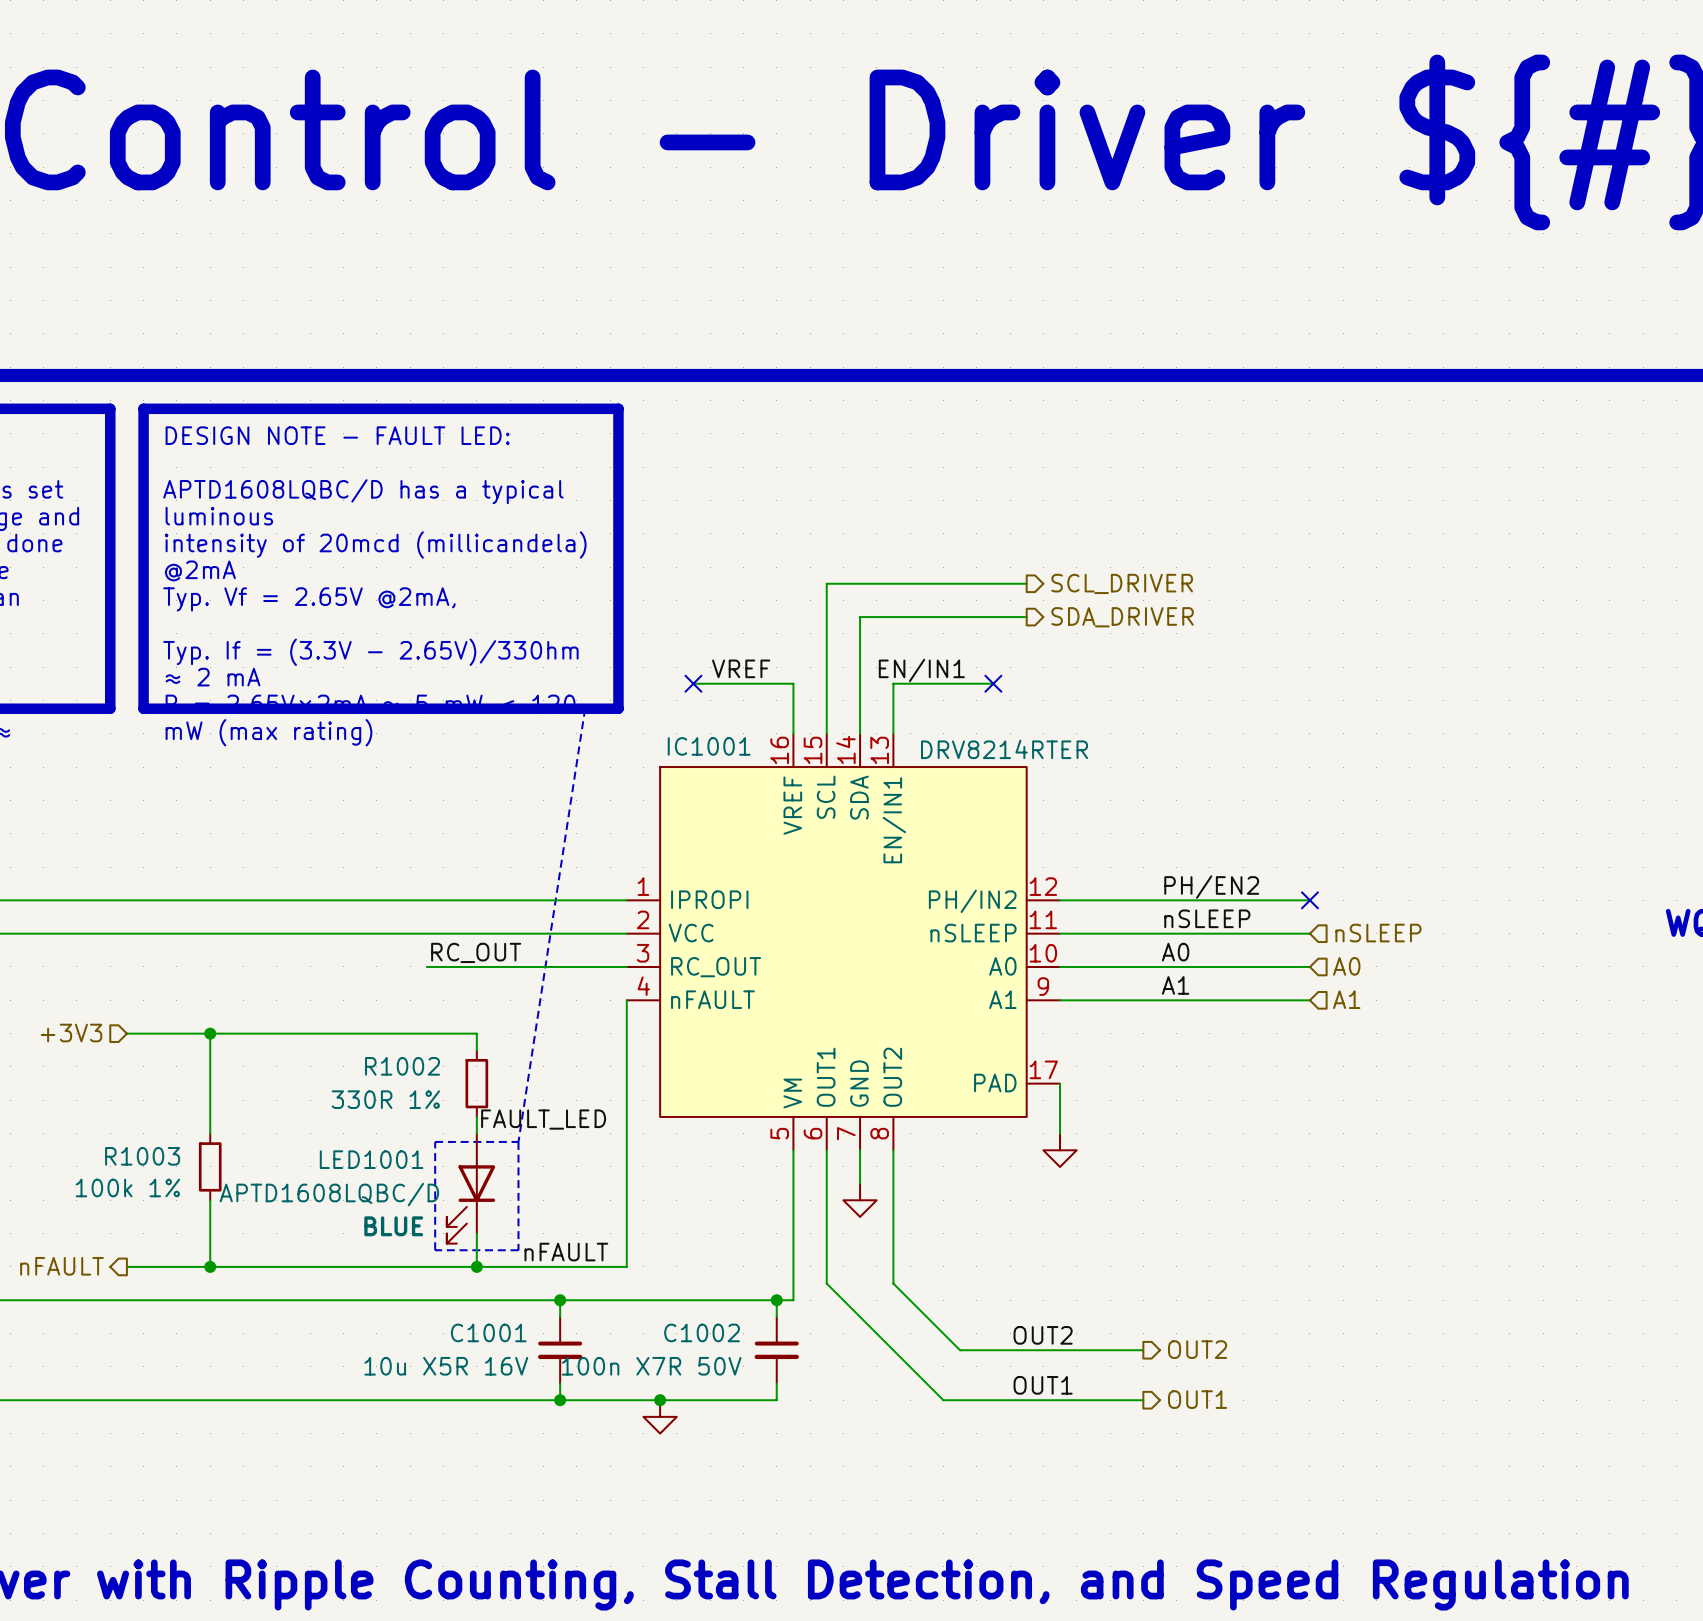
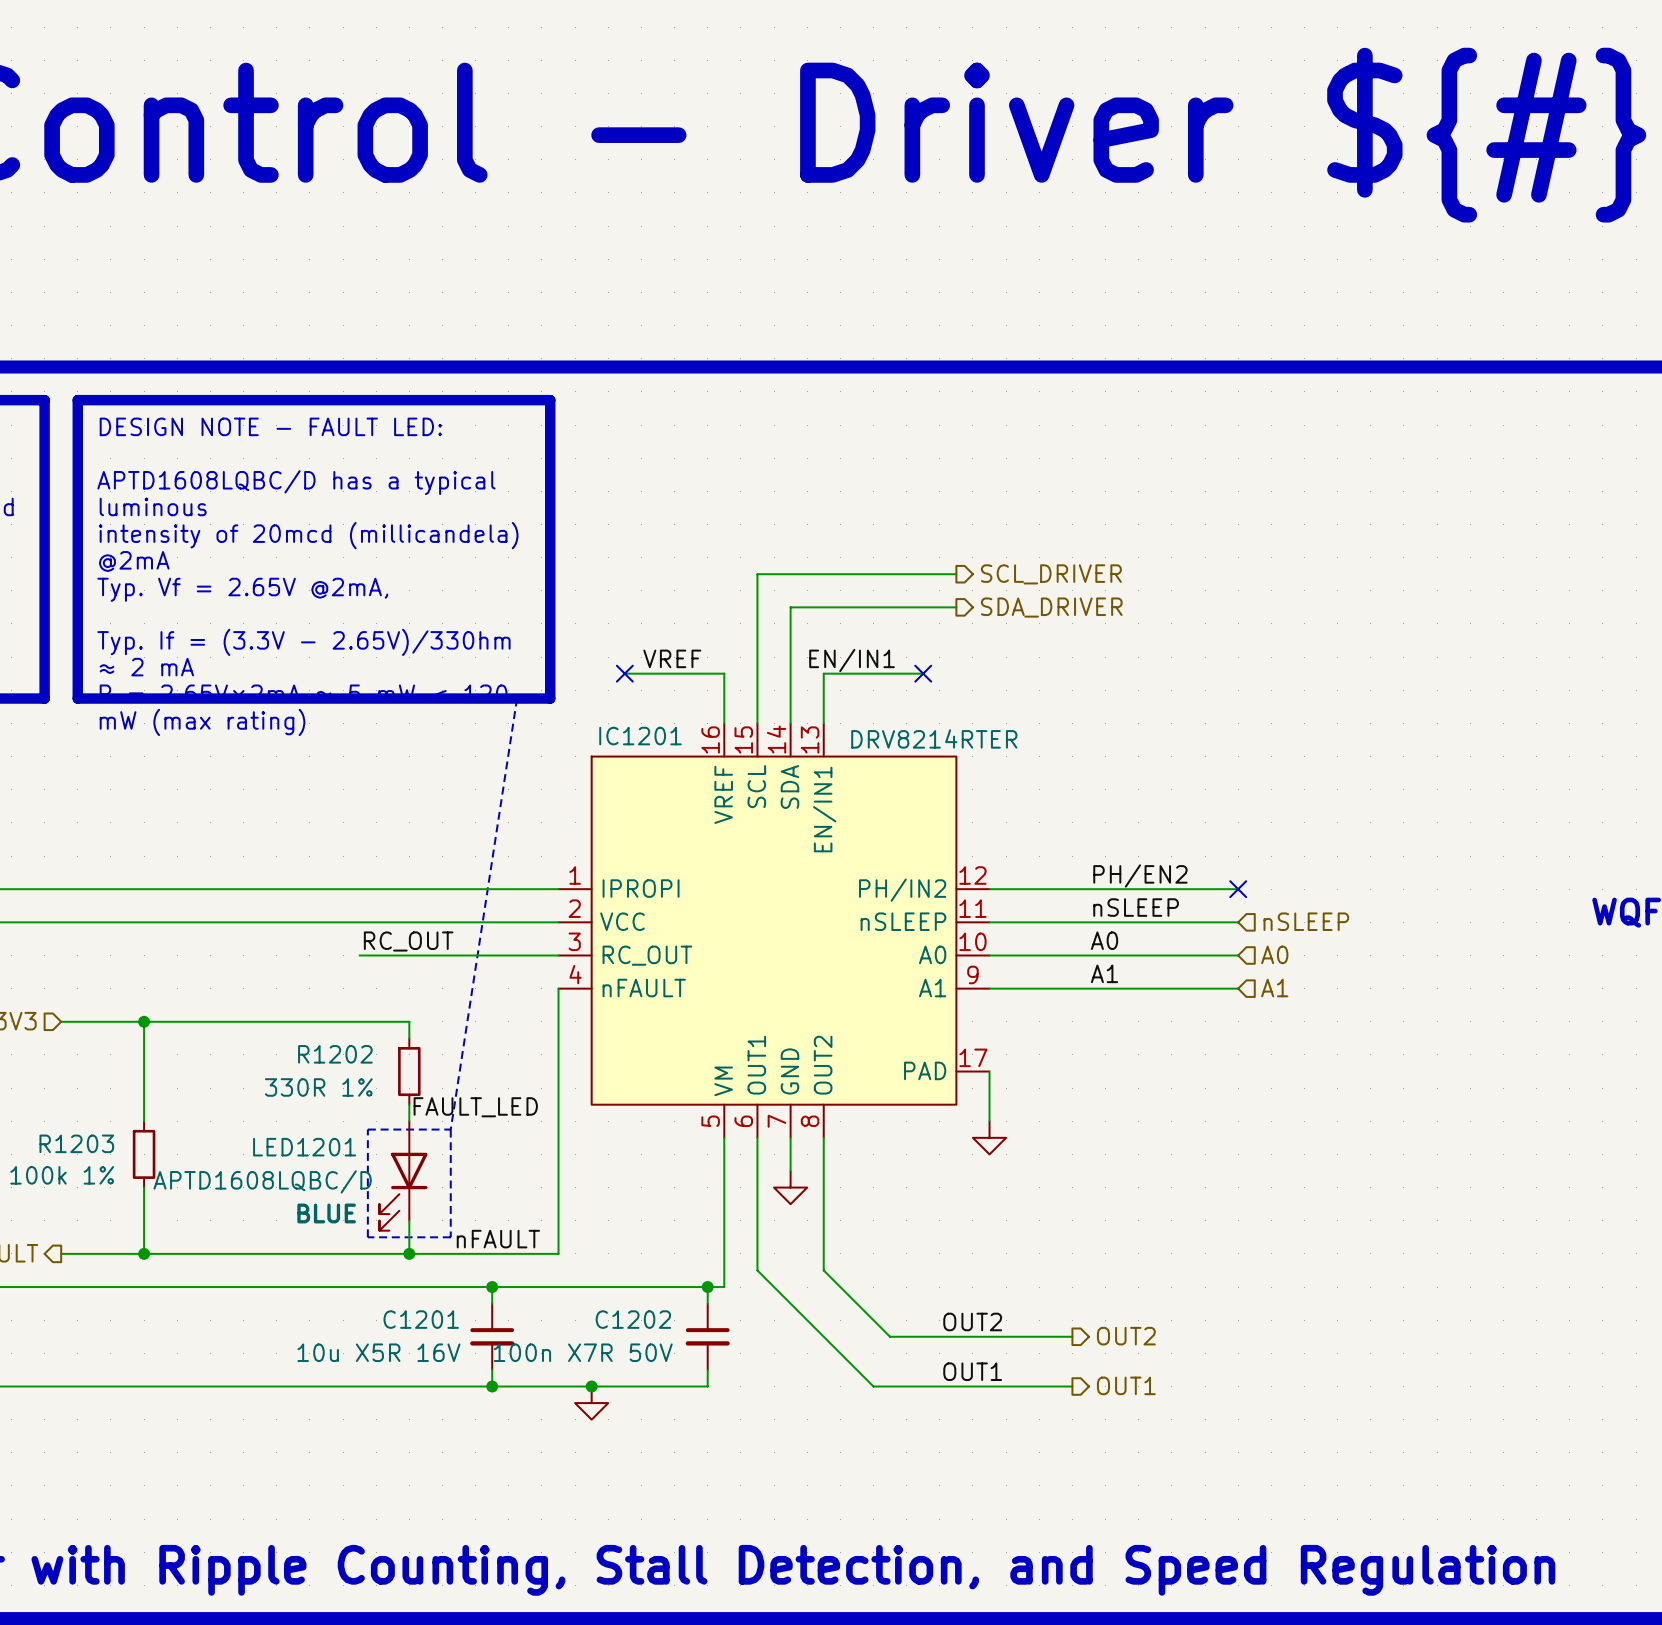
IC1001 name: IC1001 (709, 746) -> IC1201 (640, 736)
R1002 name: R1002 (402, 1066) -> R1202 (335, 1054)
R1003 name: R1003 (142, 1156) -> R1203 (76, 1143)
LED1001 name: LED1001 (371, 1159) -> LED1201 (304, 1147)
C1001 name: C1001 (488, 1332) -> C1201 (421, 1319)
C1002 name: C1002 (702, 1332) -> C1202 (633, 1319)

